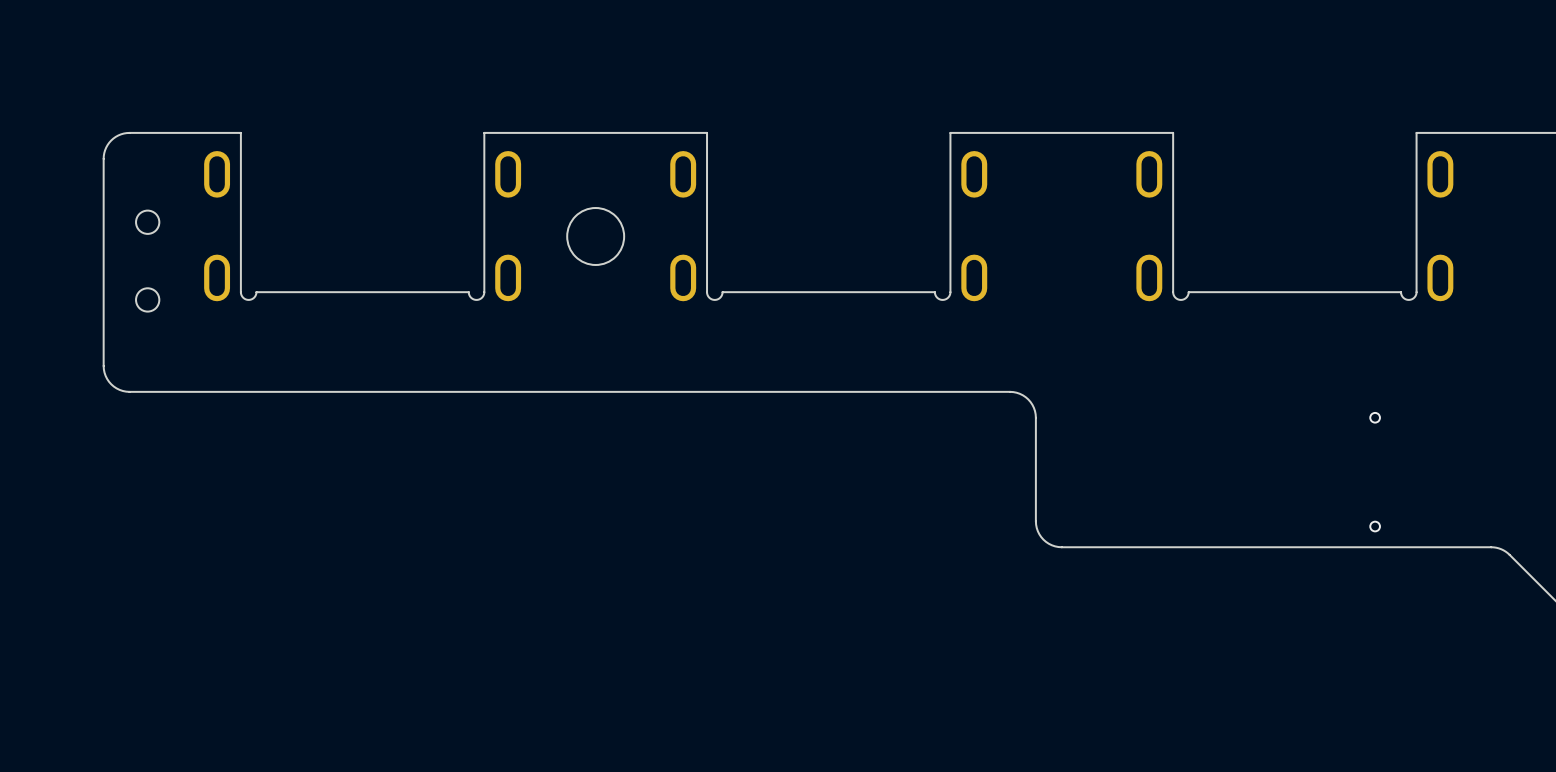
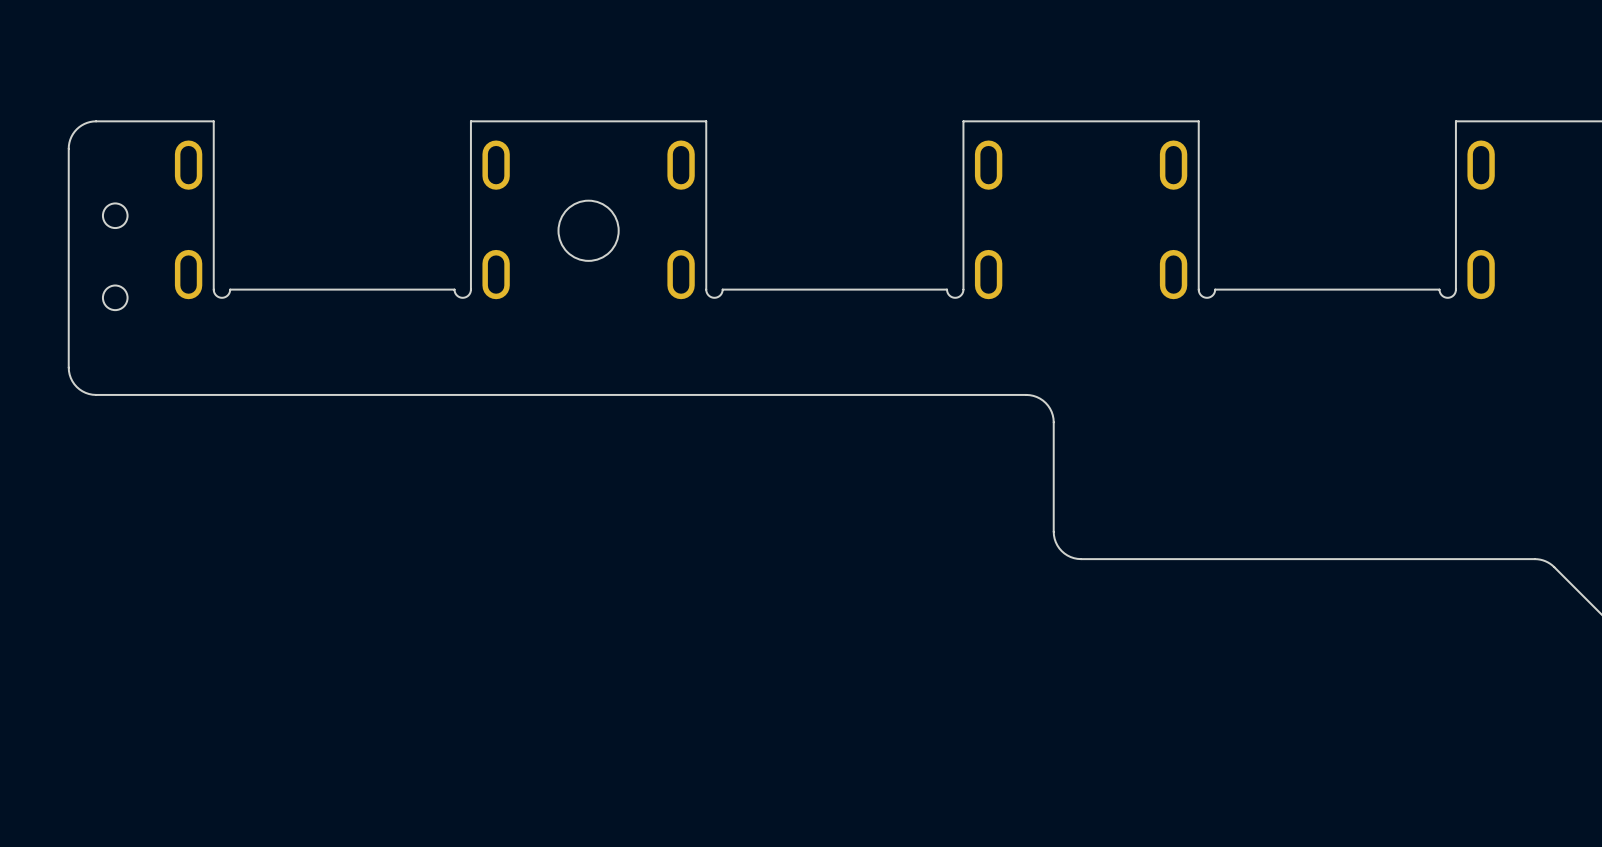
via: (1375, 417) -> none
via: (1375, 526) -> none

